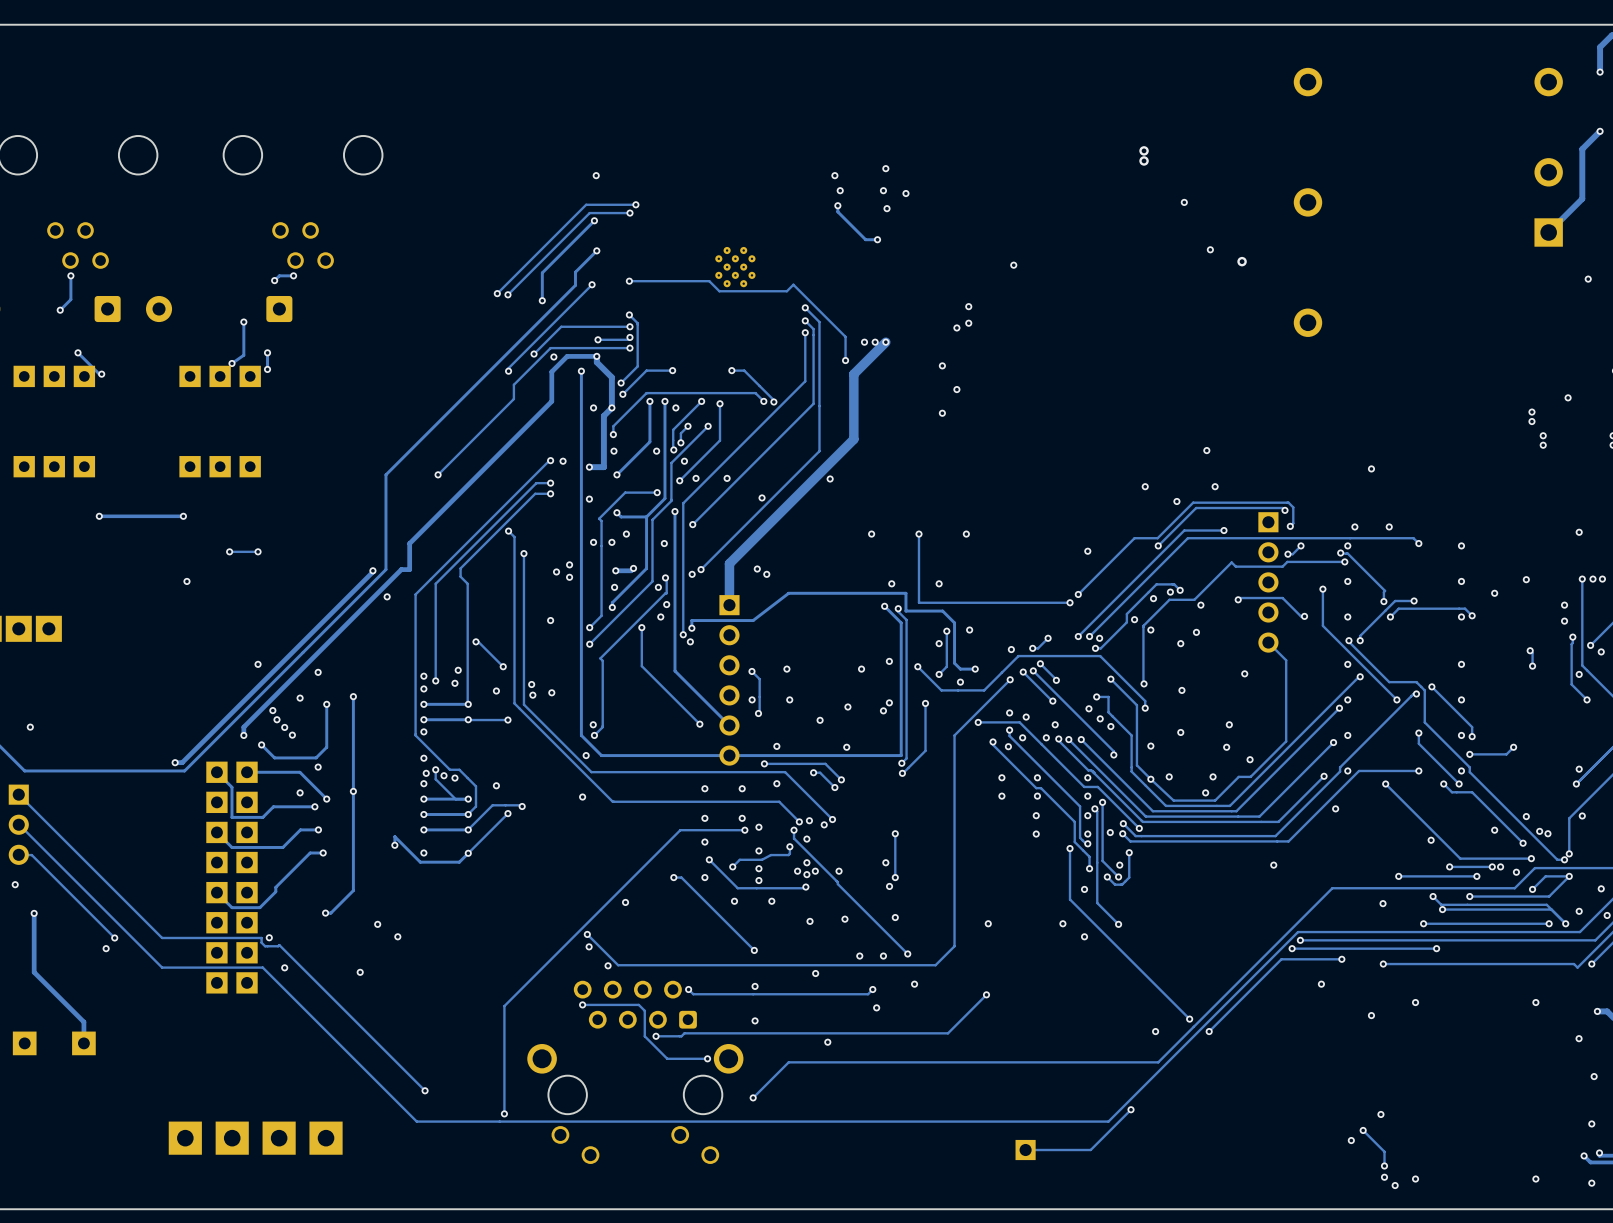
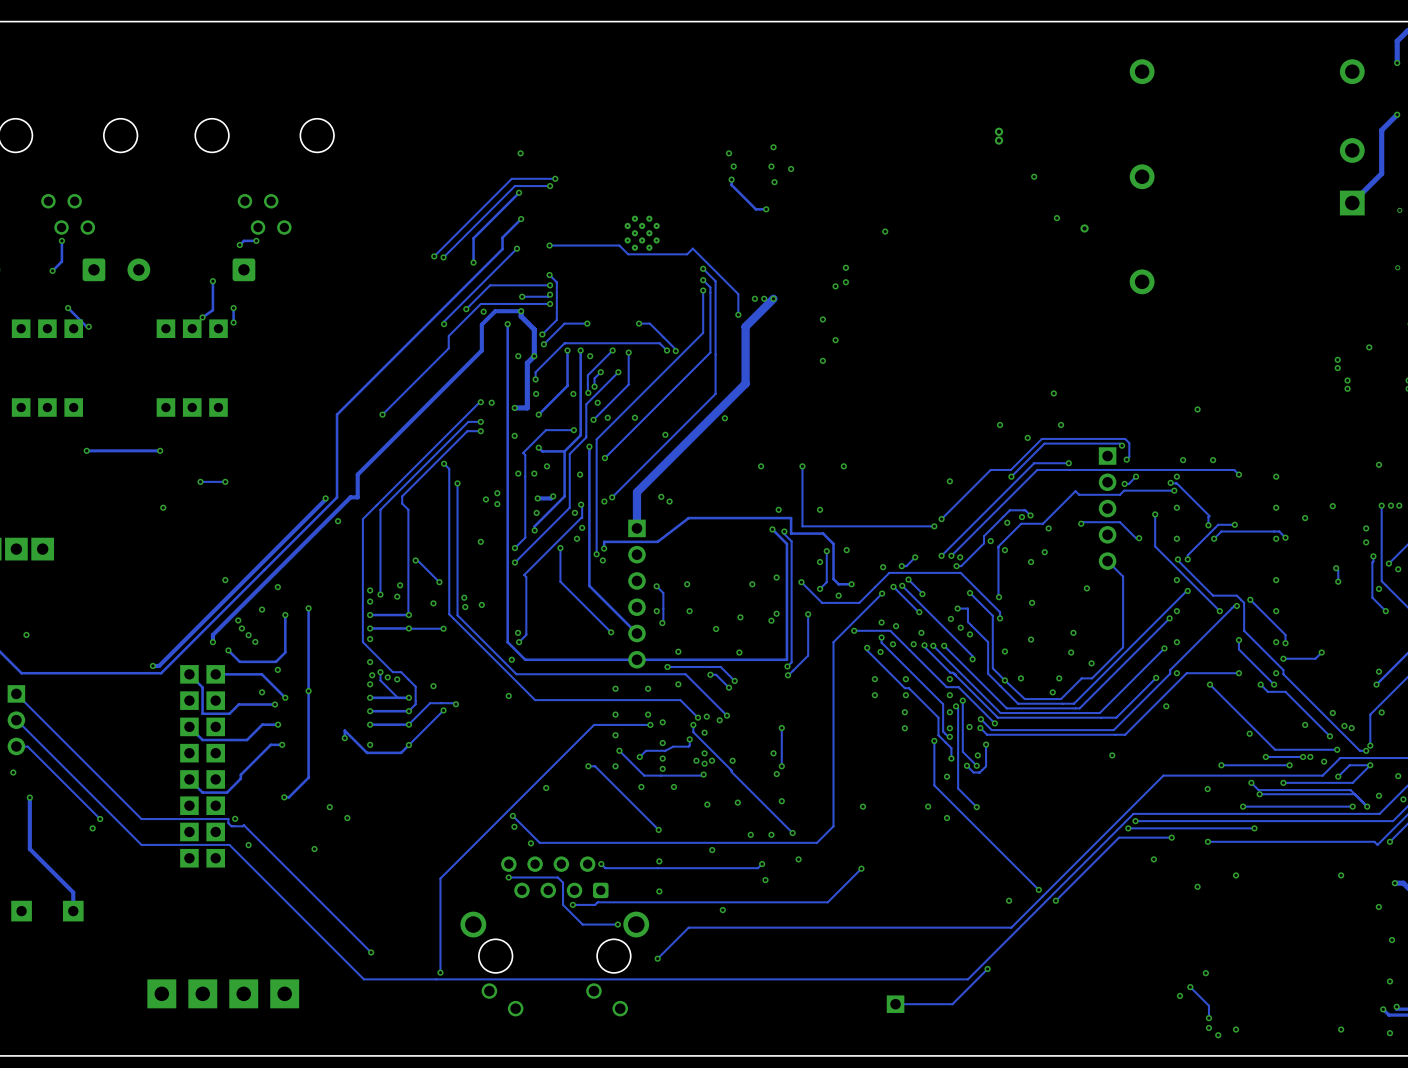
via: none -> (1399, 210)
via: (1588, 279) -> none
via: none -> (1397, 267)

